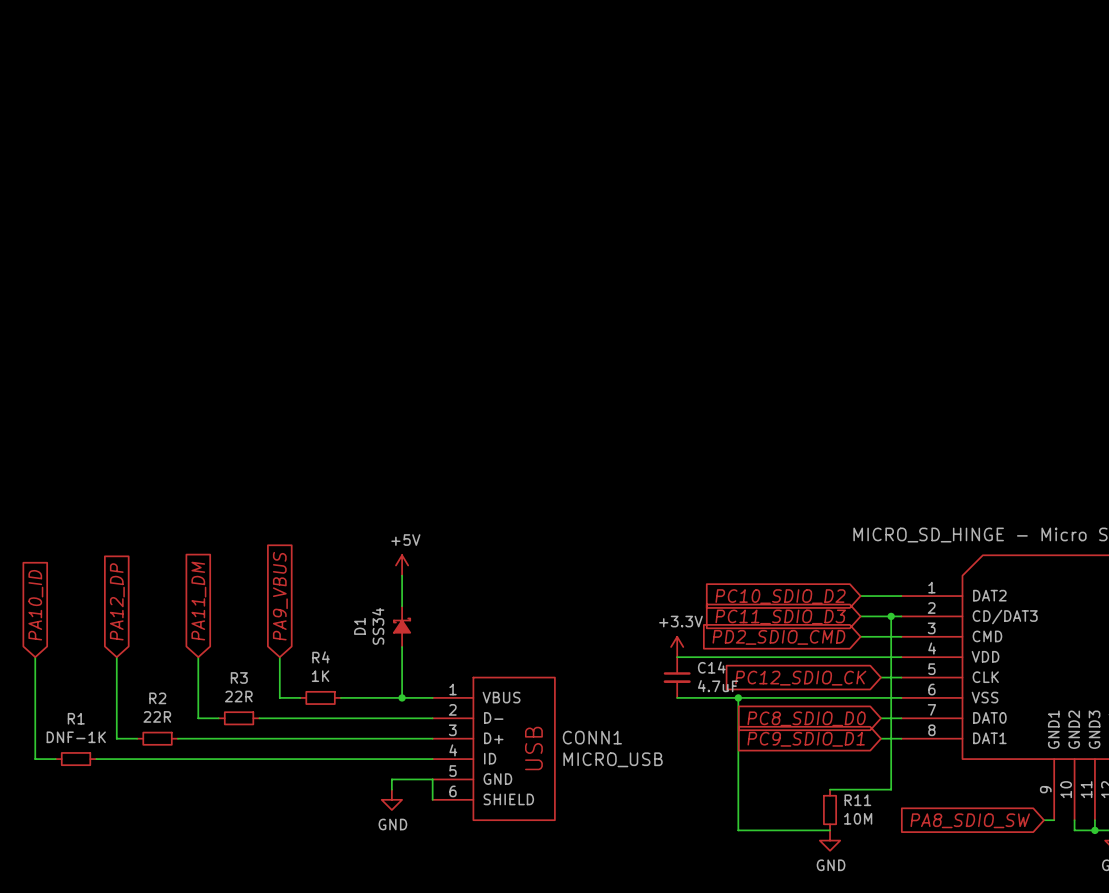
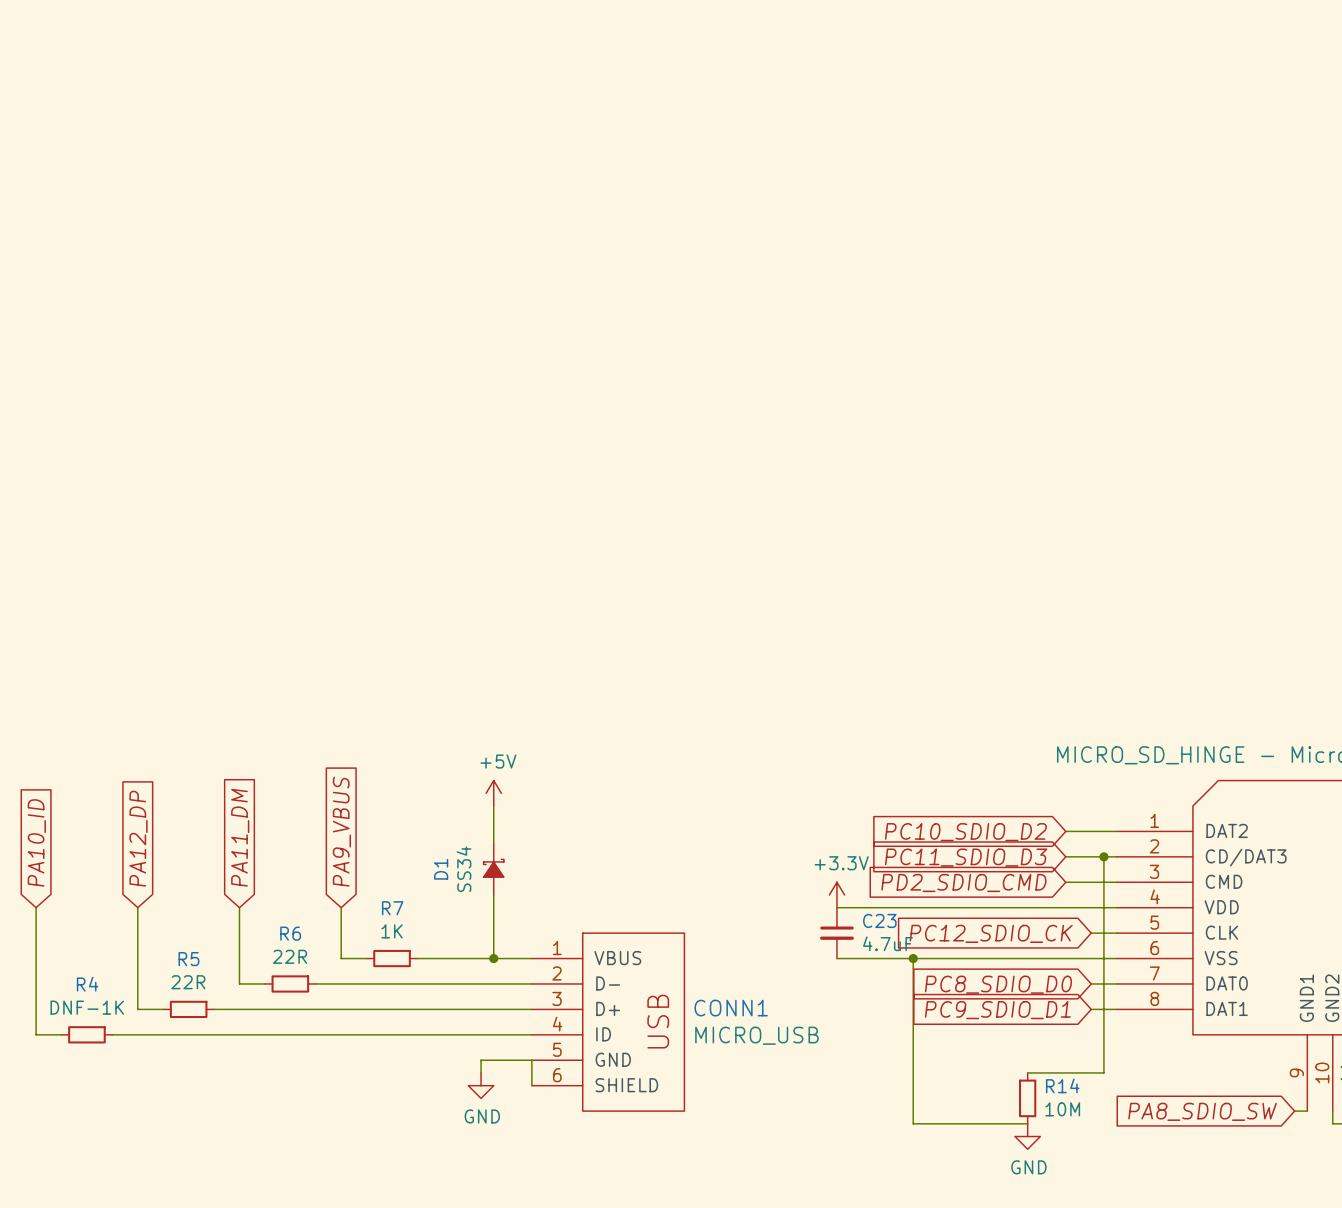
R4 name: R4 (321, 657) -> R7 (392, 908)
C14 name: C14 (711, 667) -> C23 (879, 920)
R3 name: R3 (239, 677) -> R6 (290, 933)
R2 name: R2 (157, 698) -> R5 (188, 959)
R1 name: R1 (76, 718) -> R4 (87, 984)
R11 name: R11 (857, 800) -> R14 (1062, 1085)

